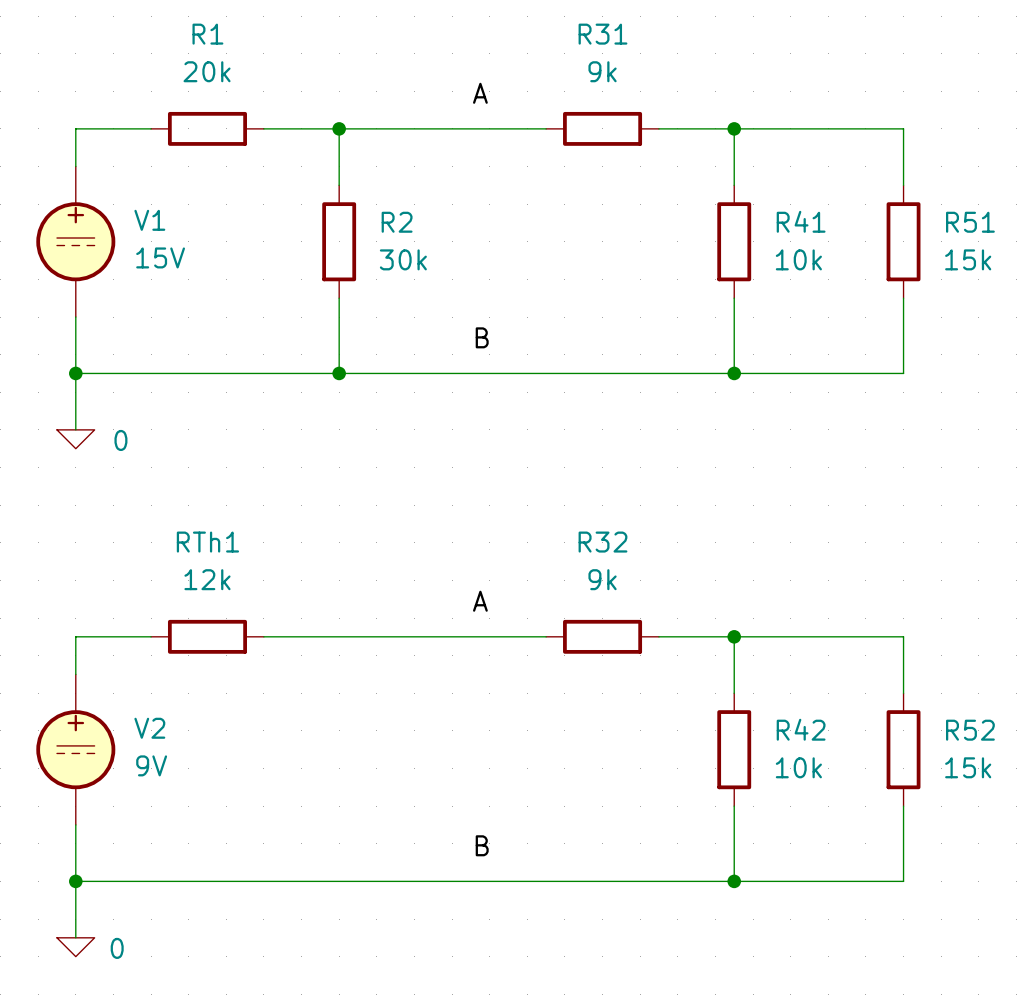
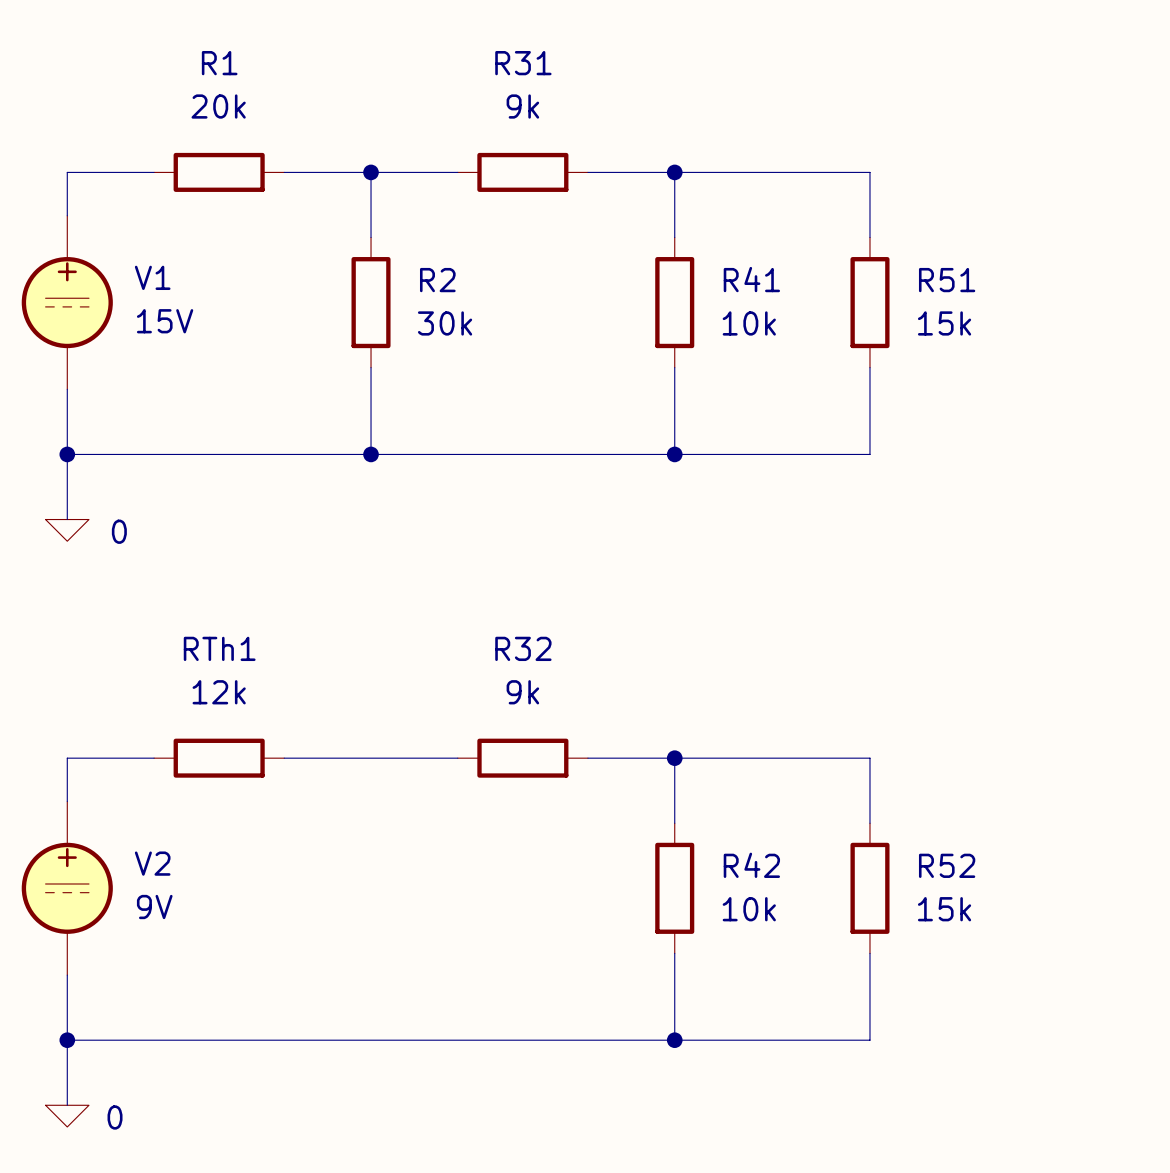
label: A (480, 93) -> none
wire: (414, 128) (527, 128) -> (609, 172) (739, 172)
junction: none -> (674, 172)
R31 position: (602, 128) -> (522, 172)
wire: (734, 128) (734, 185) -> (674, 172) (674, 237)
junction: (734, 128) -> none
wire: (771, 128) (903, 128) (903, 185) -> (869, 172) (869, 237)
R41 position: (734, 241) -> (674, 302)
R51 position: (903, 241) -> (869, 302)
wire: (734, 298) (734, 373) -> (674, 367) (674, 454)
wire: (903, 298) (903, 373) (771, 373) -> (869, 367) (869, 454)
label: B (482, 337) -> none
junction: none -> (674, 454)
junction: (734, 373) -> none
label: A (480, 601) -> none
wire: (414, 636) (527, 636) -> (609, 758) (739, 758)
junction: none -> (674, 758)
R32 position: (602, 636) -> (522, 758)
wire: (734, 636) (734, 693) -> (674, 758) (674, 823)
junction: (734, 636) -> none
wire: (771, 636) (903, 636) (903, 693) -> (869, 758) (869, 823)
R42 position: (734, 749) -> (674, 888)
R52 position: (903, 749) -> (869, 888)
wire: (734, 806) (734, 881) -> (674, 953) (674, 1040)
wire: (903, 806) (903, 881) (771, 881) -> (869, 953) (869, 1040)
label: B (482, 845) -> none
junction: none -> (674, 1040)
junction: (734, 881) -> none

